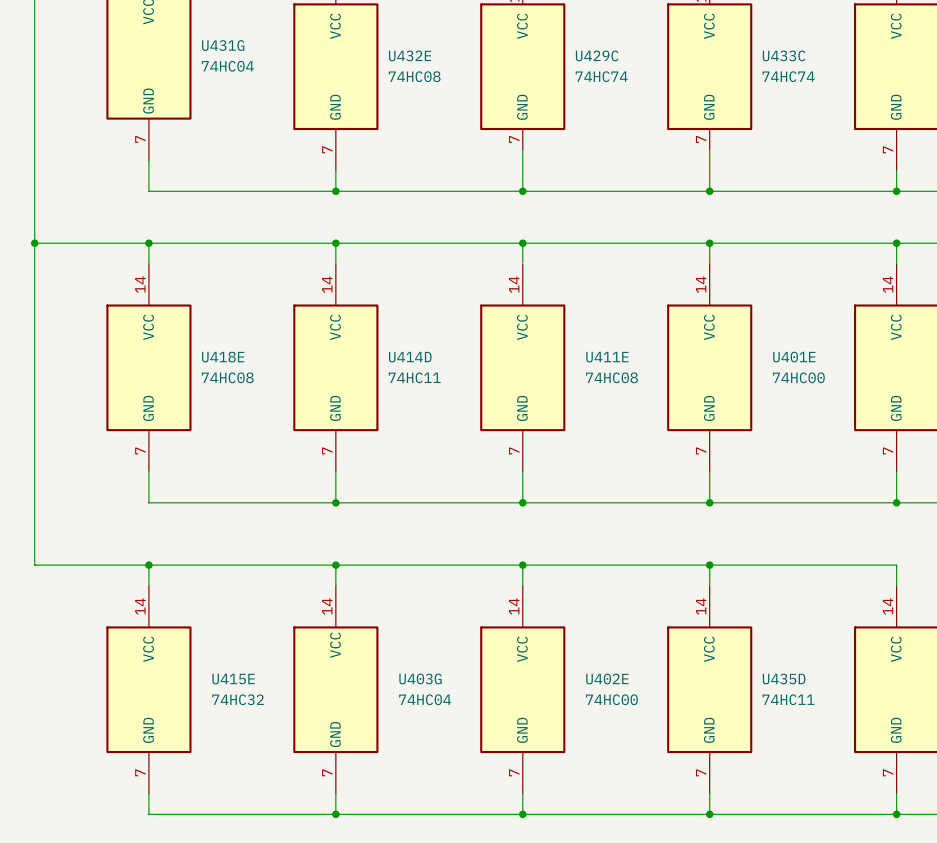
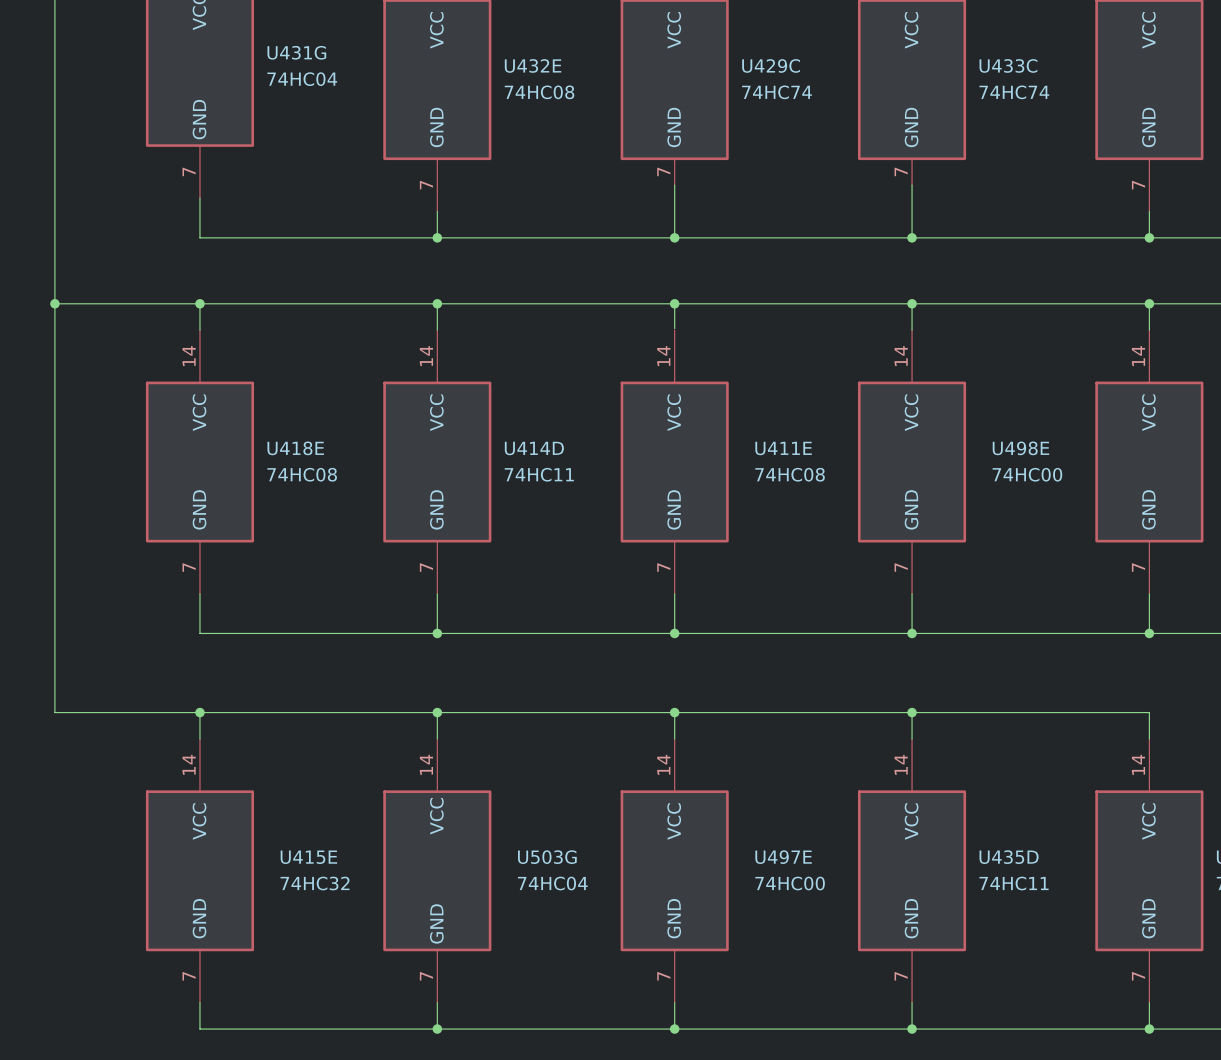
U401E name: U401E (794, 357) -> U498E (1020, 448)
U403G name: U403G (420, 678) -> U503G (547, 857)
U402E name: U402E (607, 678) -> U497E (783, 857)

